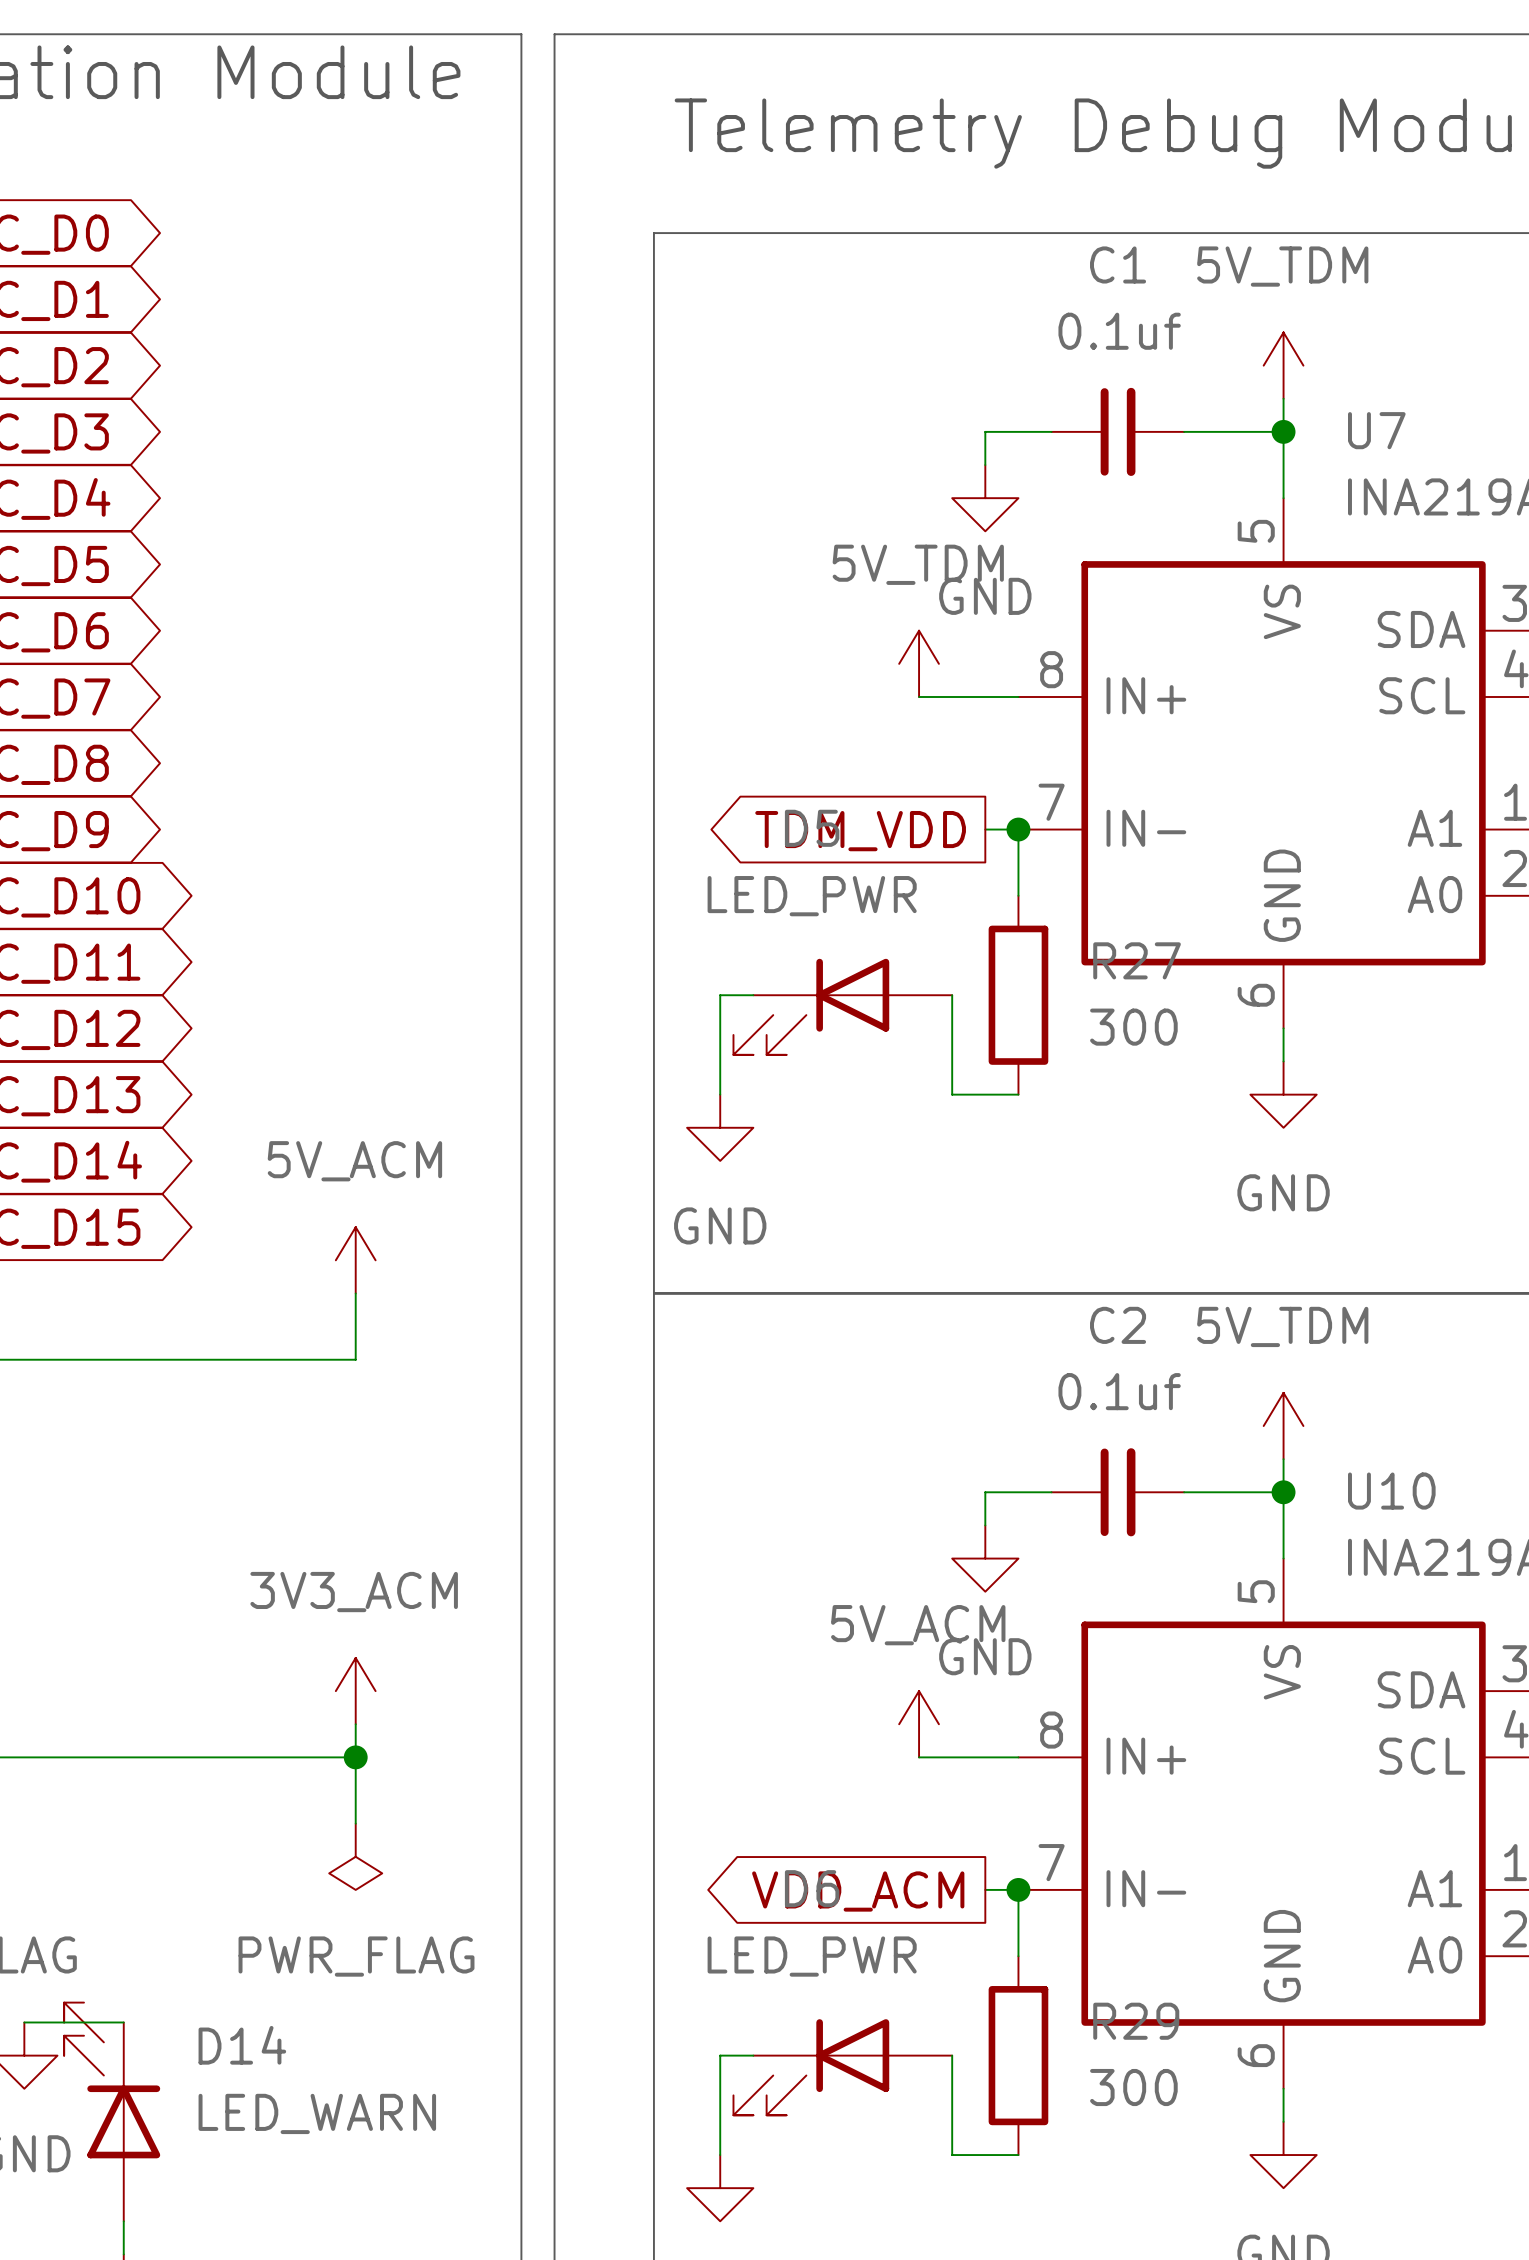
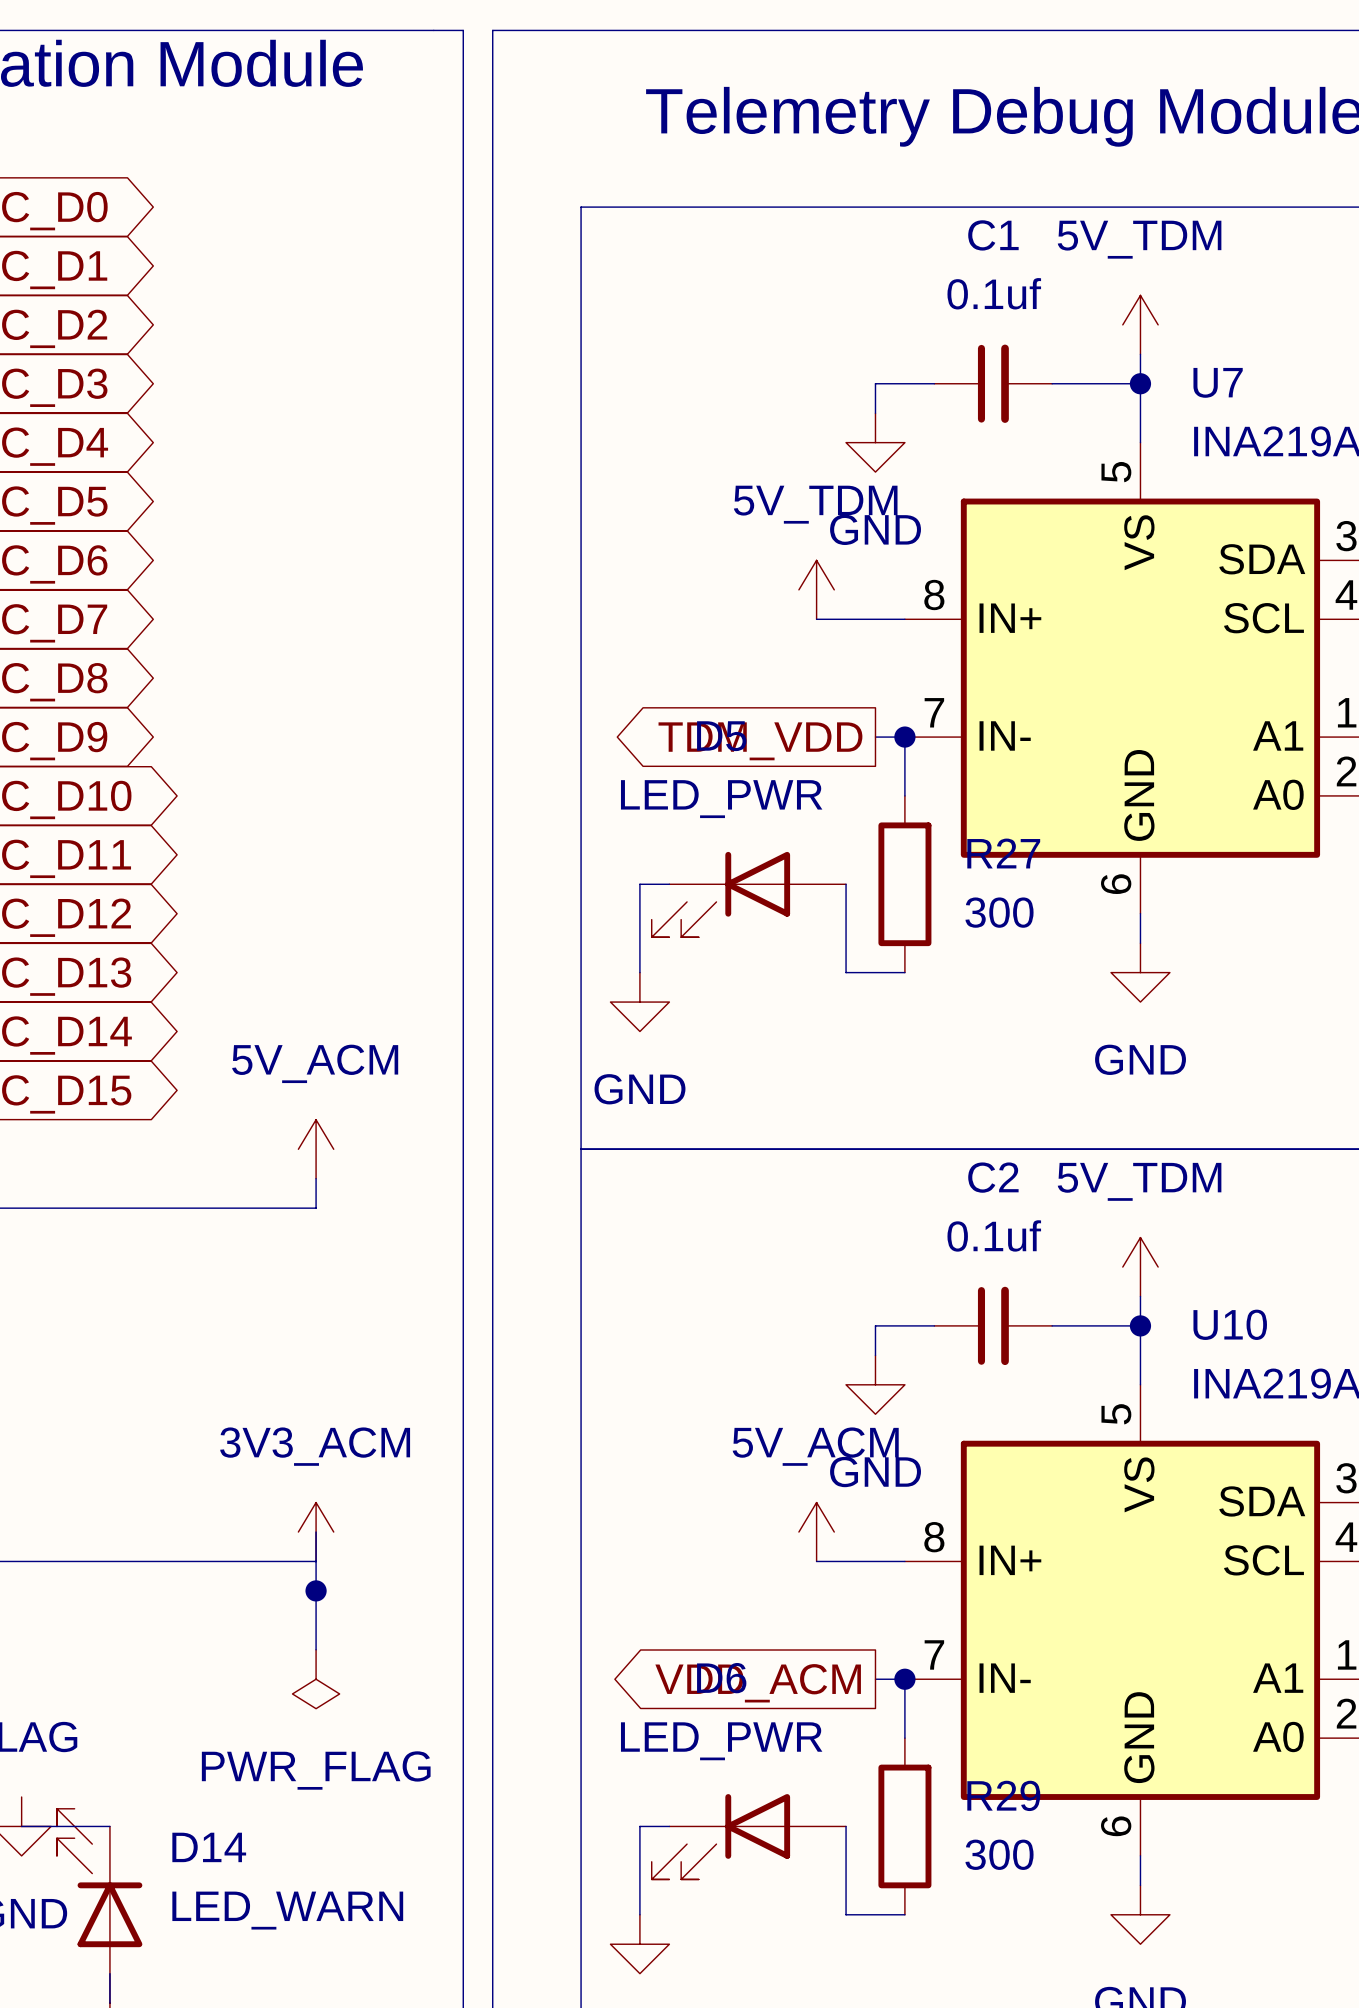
power symbol position: 5V_ACM (355, 1260) -> 5V_ACM (316, 1149)
power symbol position: 3V3_ACM (355, 1691) -> 3V3_ACM (316, 1532)
junction position: (355, 1757) -> (316, 1590)
power symbol position: PWR_FLAG (355, 1856) -> PWR_FLAG (316, 1679)
wire: (24, 2022) (123, 2022) -> (21, 1826) (109, 1826)
D14 position: (112, 2111) -> (99, 1905)

